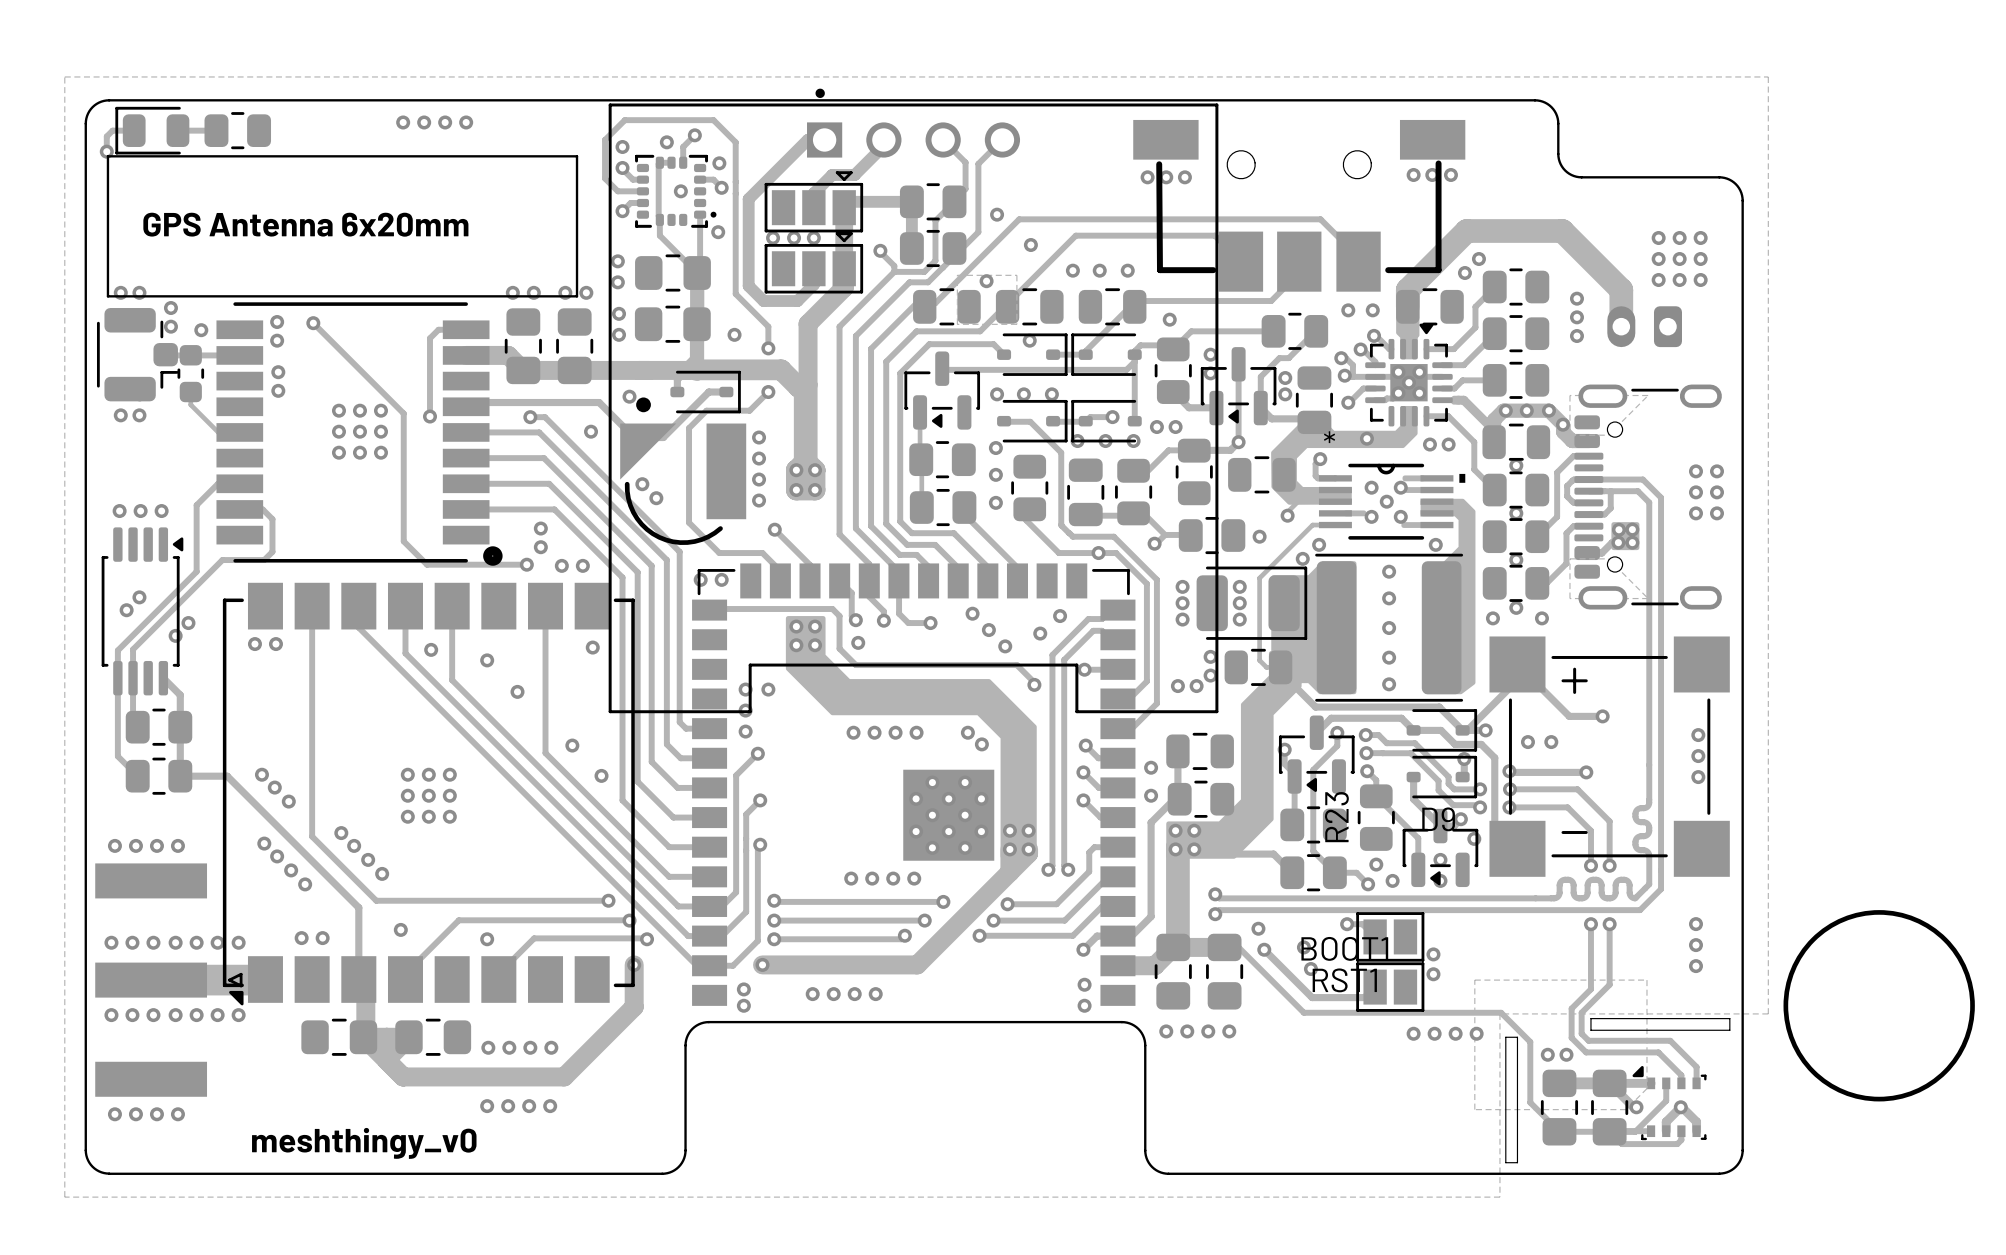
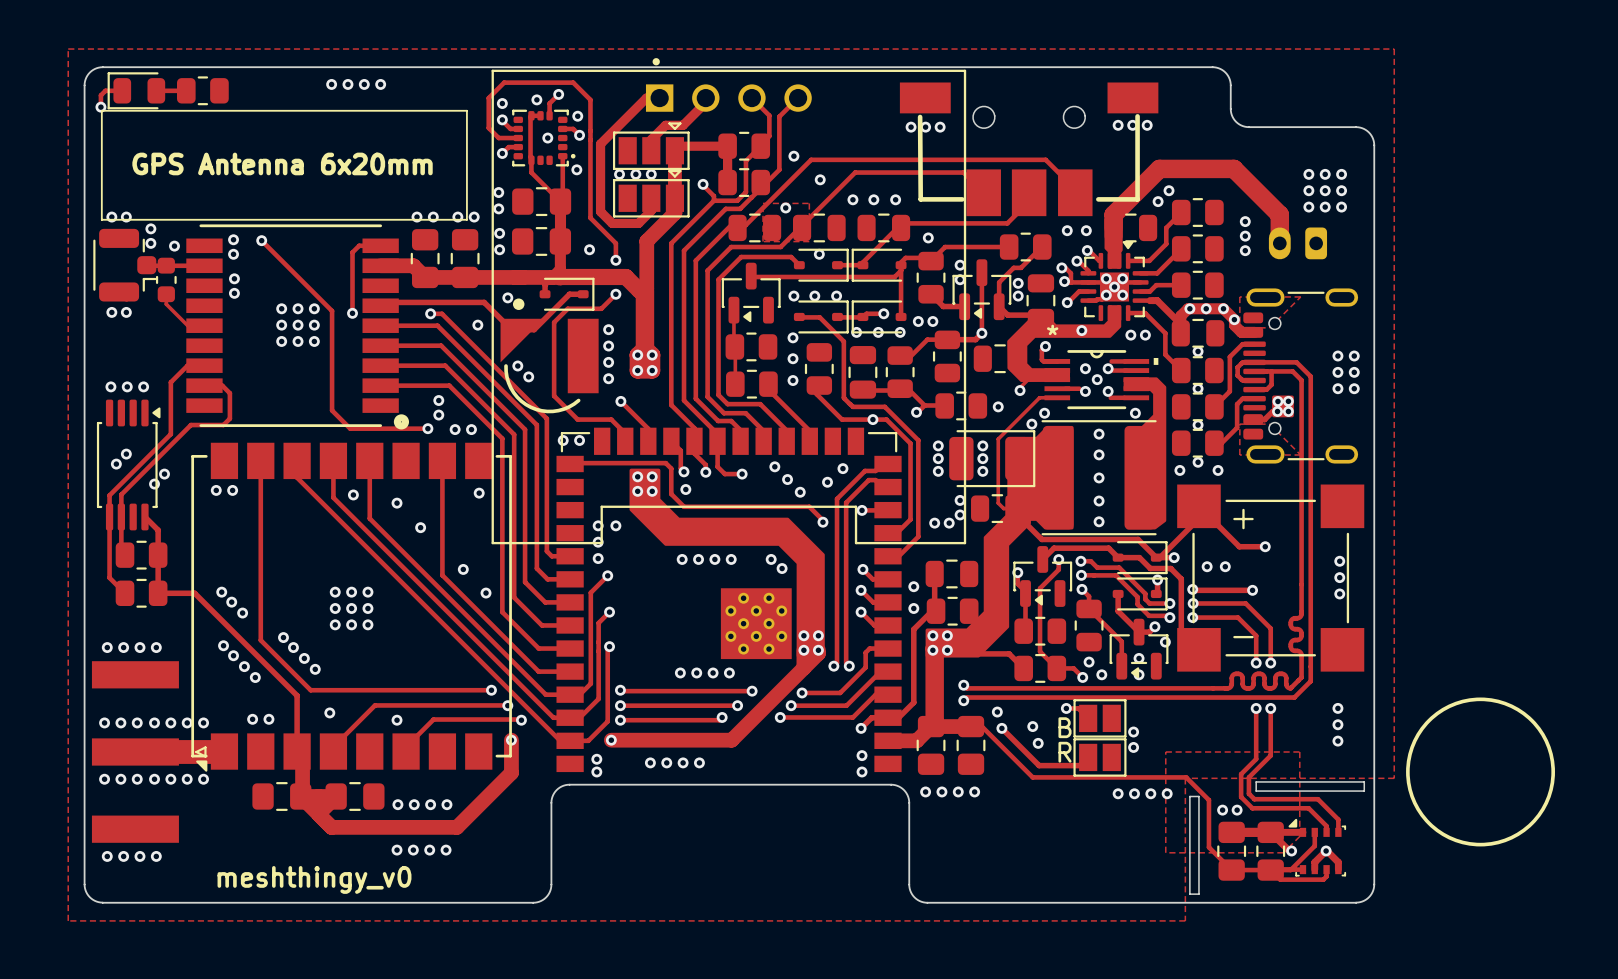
R23 name: R23 (1336, 817) -> none
D9 name: D9 (1438, 819) -> none
BOOT1 name: BOOT1 (1344, 948) -> B (1064, 727)
RST1 name: RST1 (1344, 980) -> R (1064, 752)

